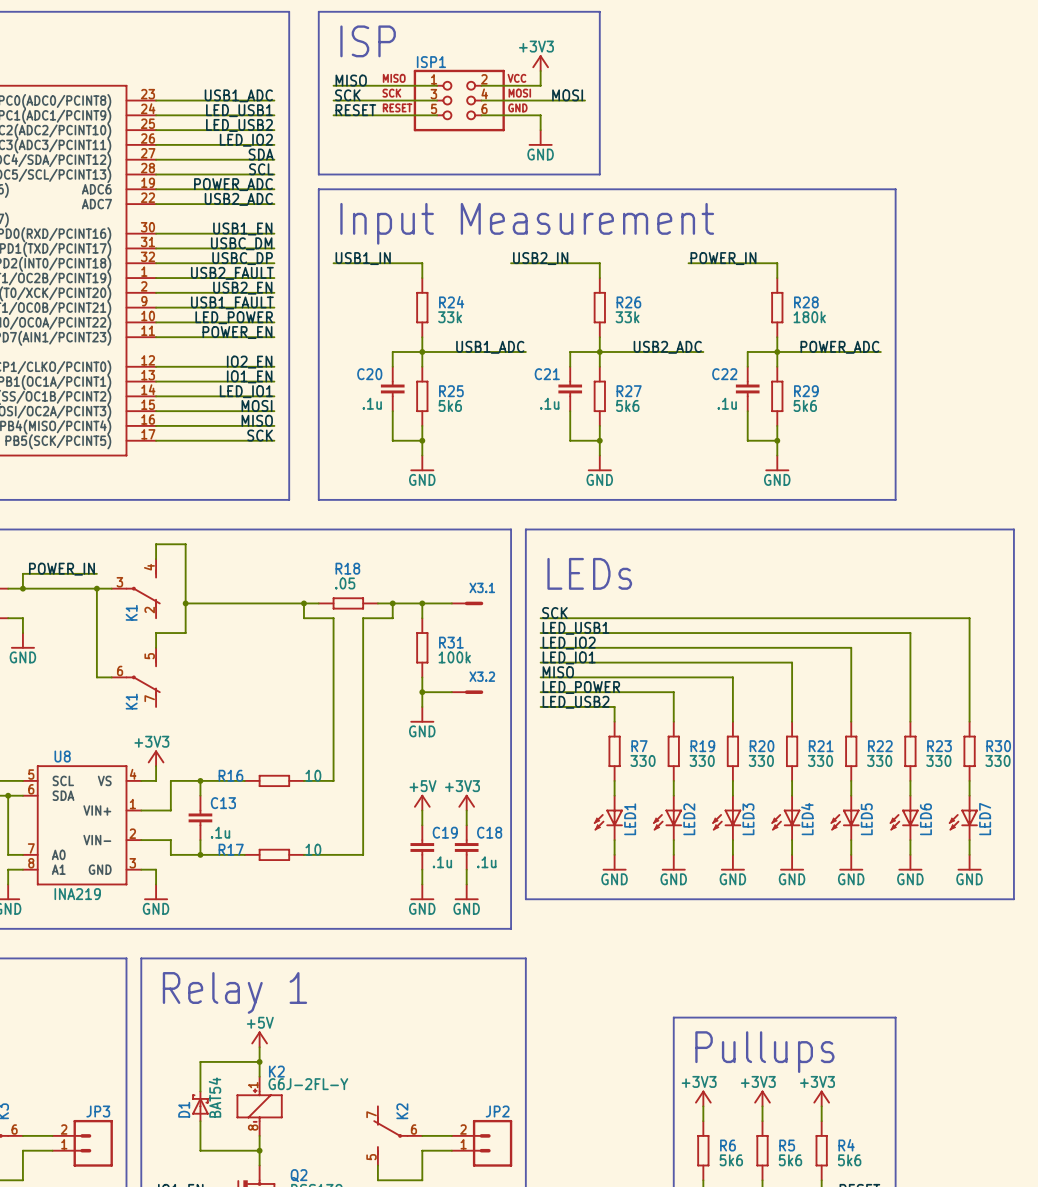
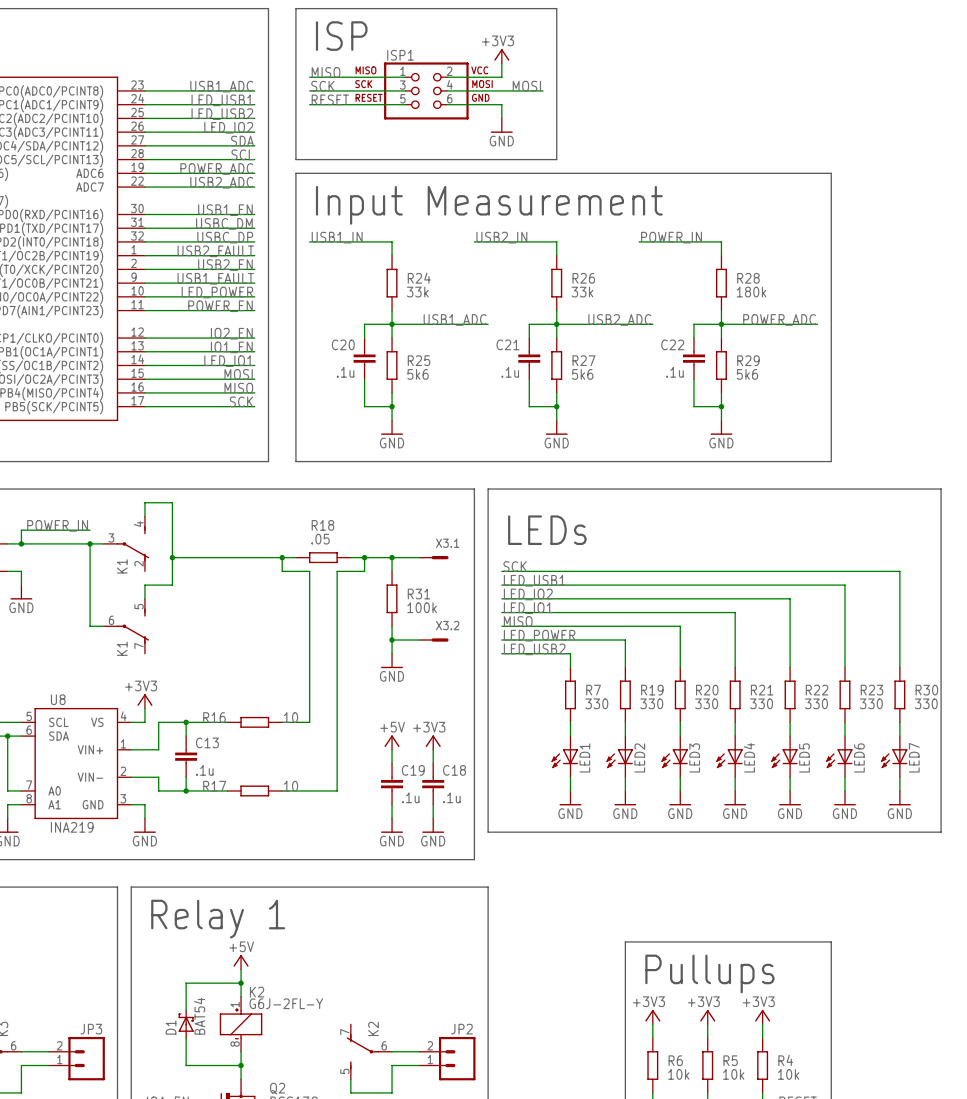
R6 value: 5k6 (731, 1160) -> 10k (678, 1074)
R5 value: 5k6 (790, 1160) -> 10k (733, 1074)
R4 value: 5k6 (849, 1160) -> 10k (788, 1074)

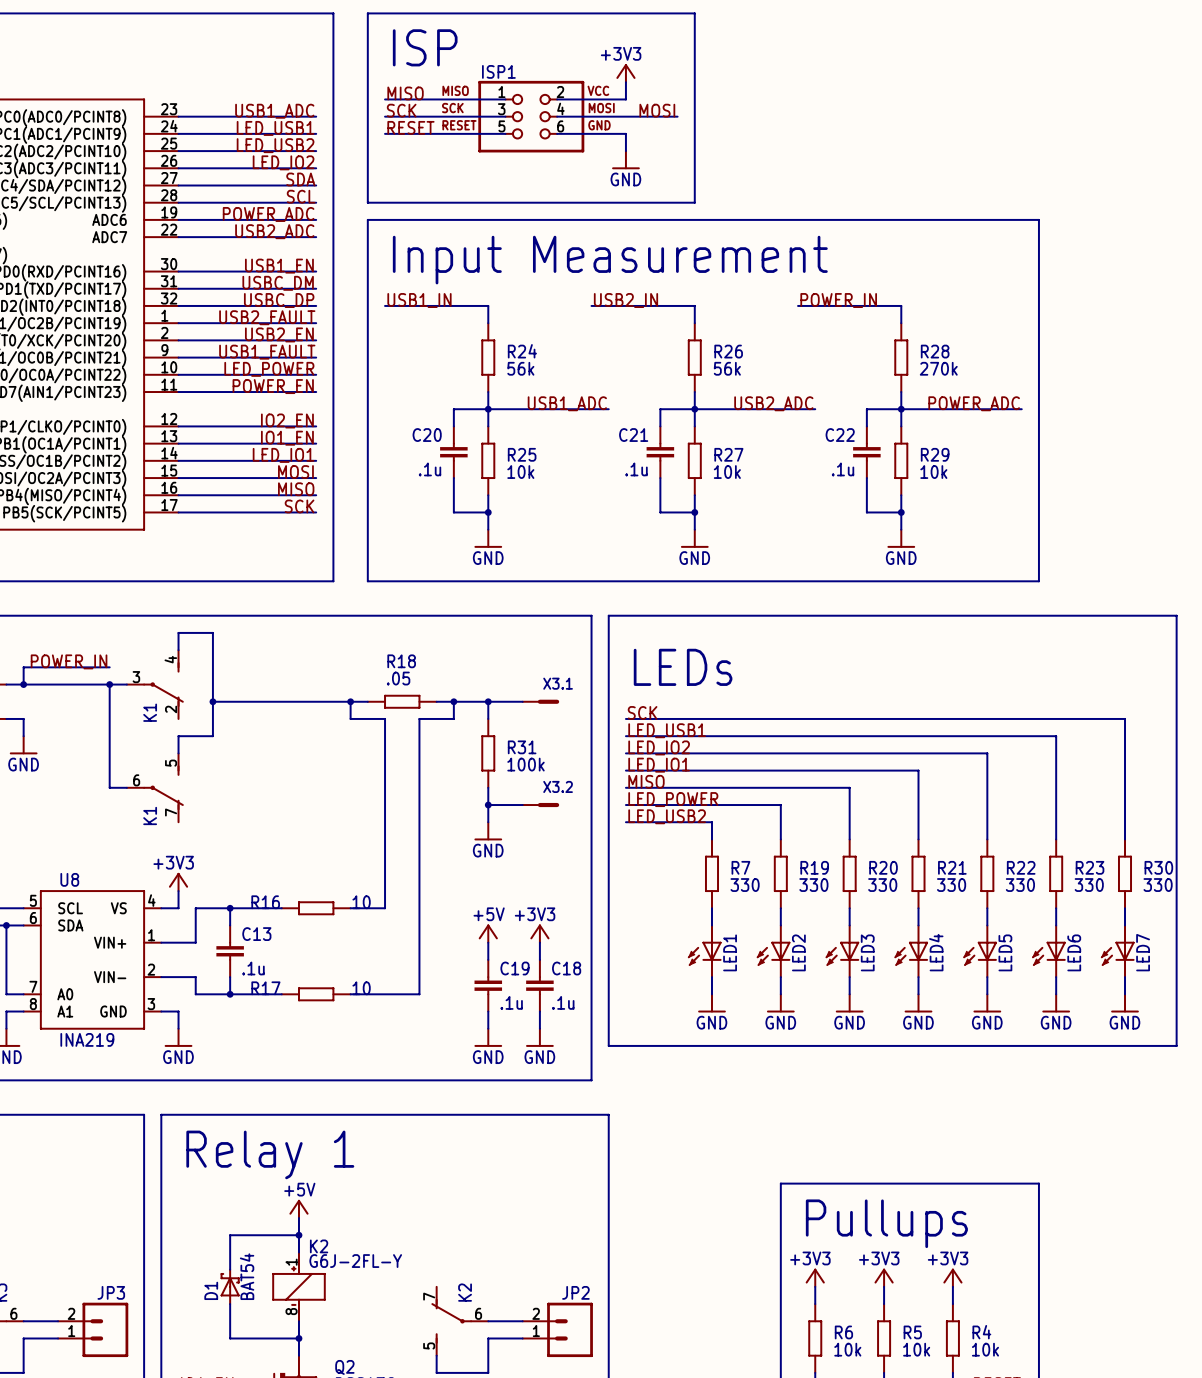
R24 value: 33k (417, 292) -> 56k (520, 368)
R26 value: 33k (582, 292) -> 56k (727, 368)
R28 value: 180k (751, 292) -> 270k (938, 368)
R25 value: 5k6 (417, 374) -> 10k (520, 472)
R27 value: 5k6 (582, 374) -> 10k (727, 472)
R29 value: 5k6 (747, 374) -> 10k (933, 472)

